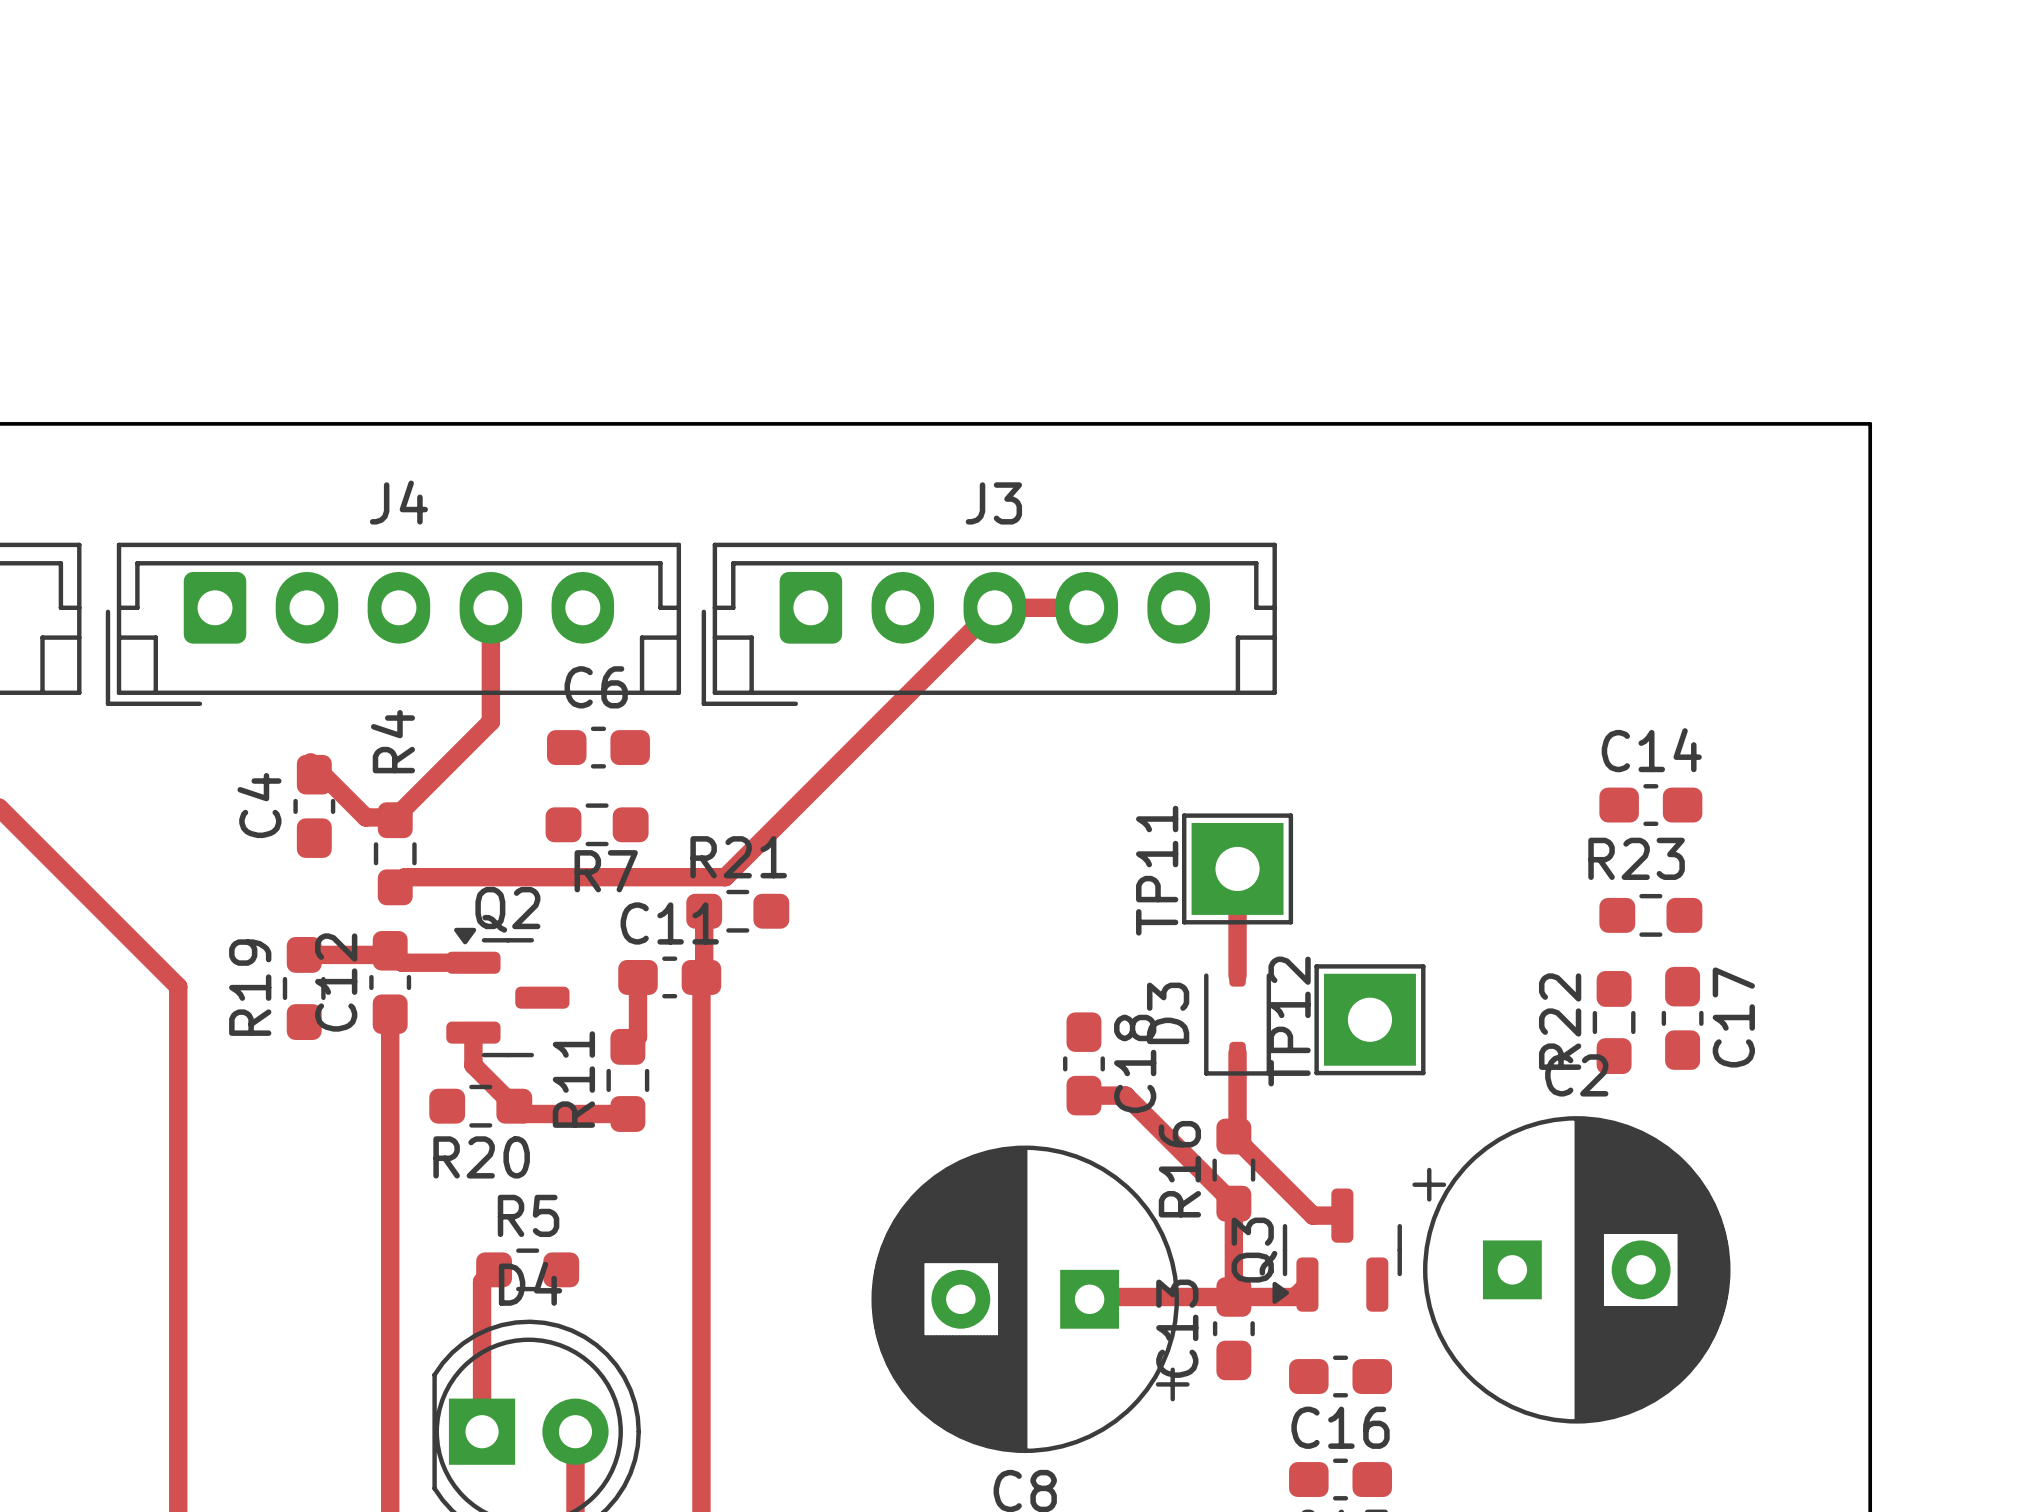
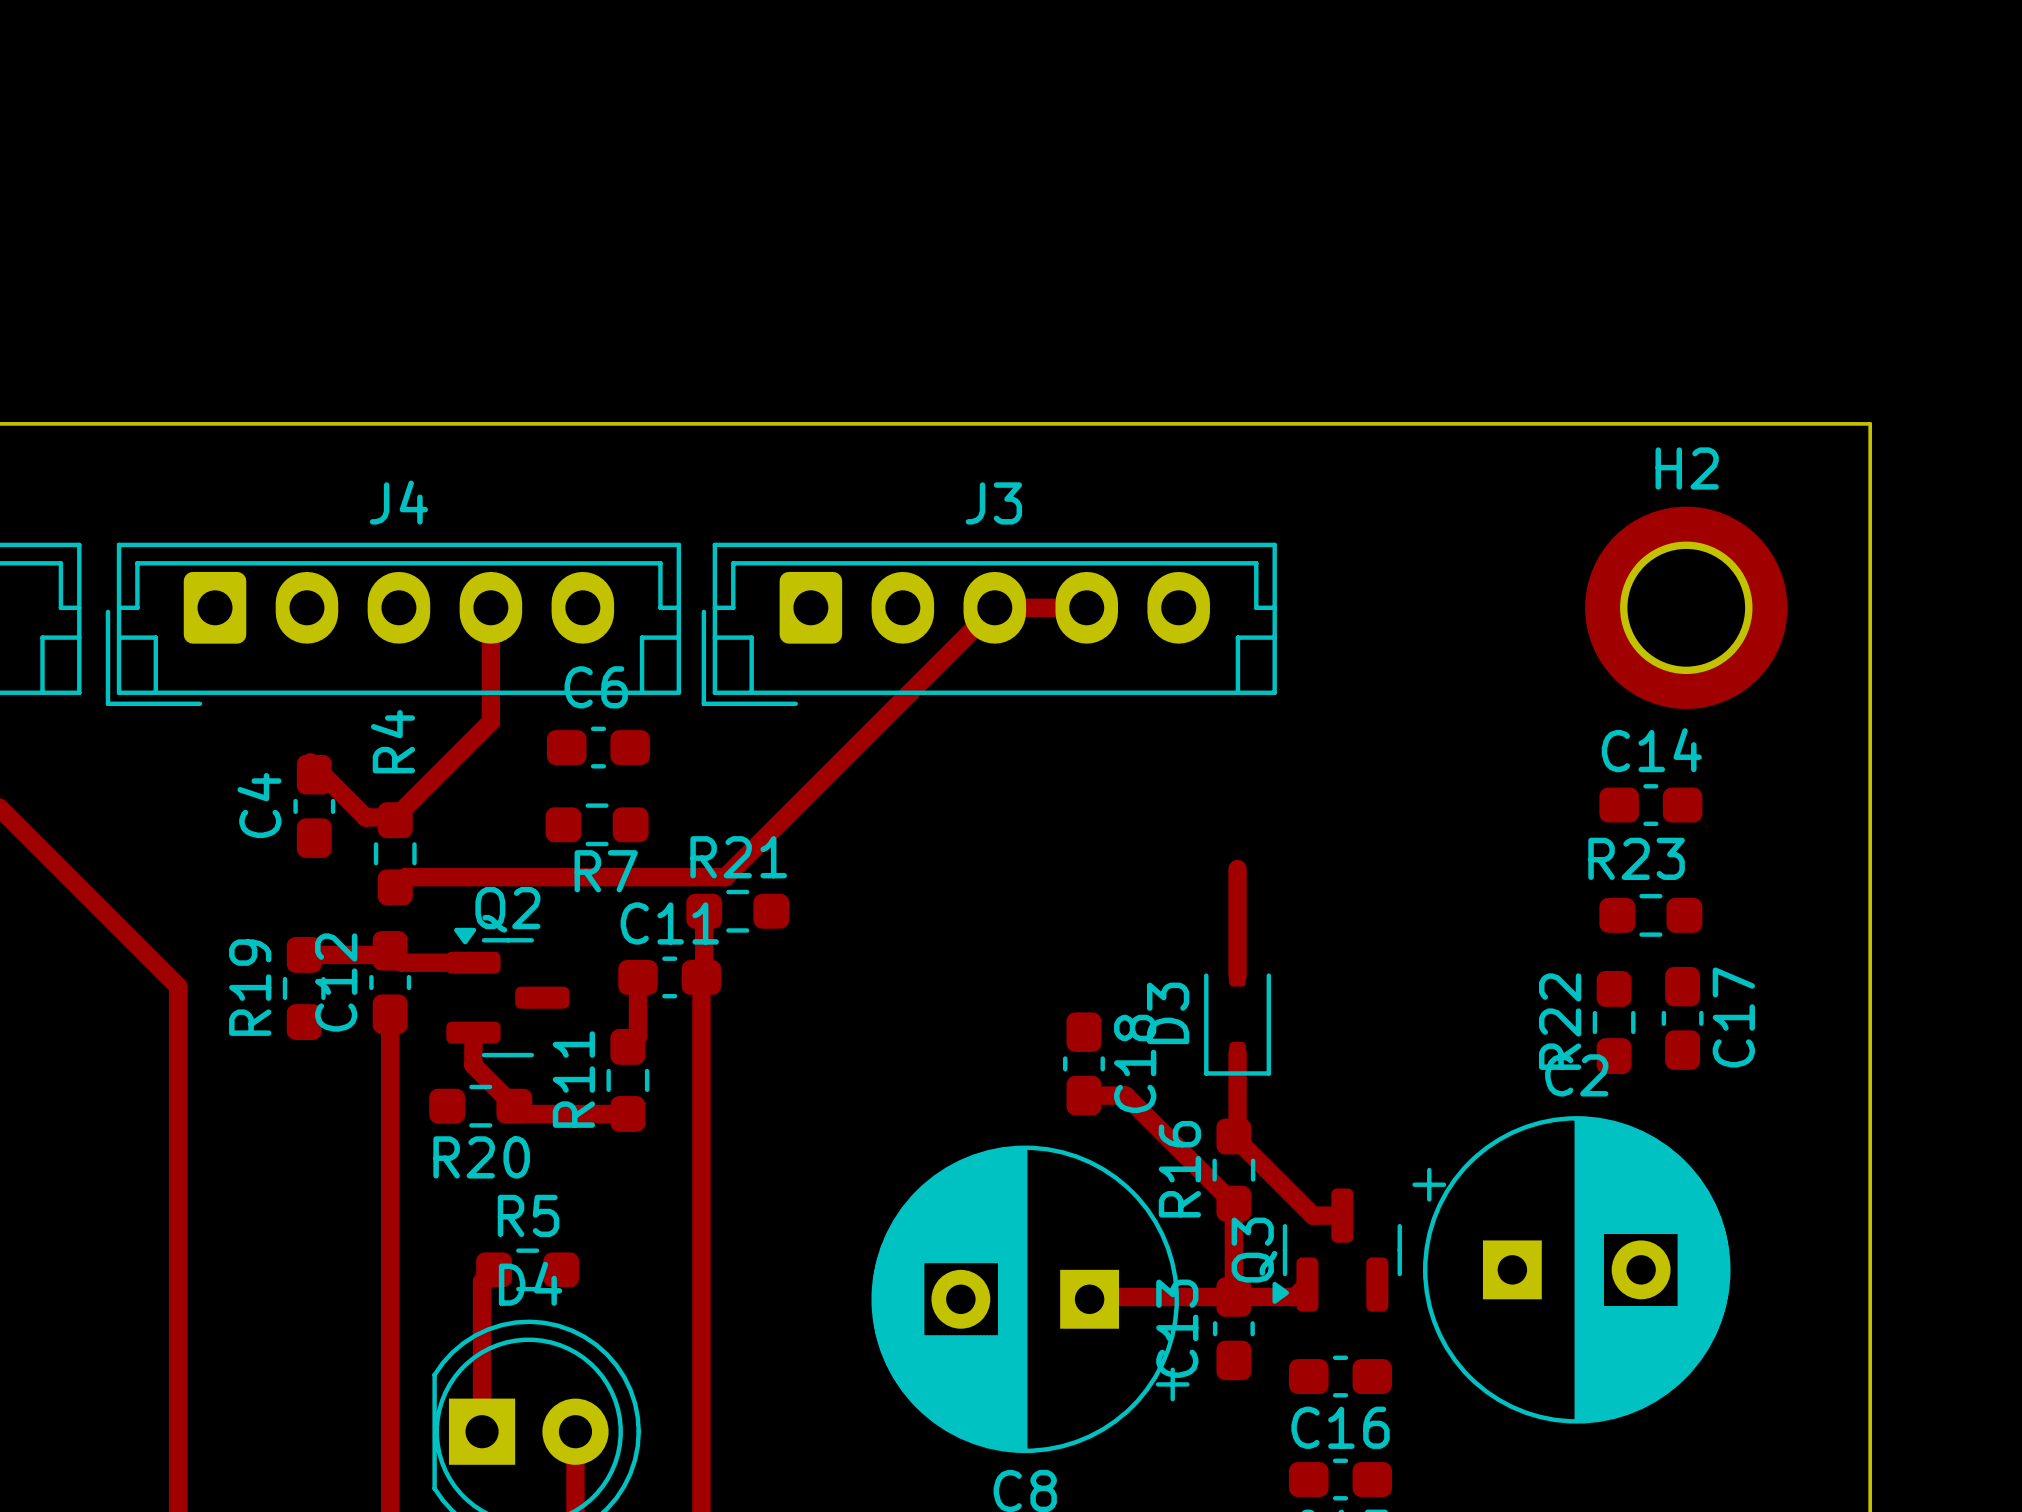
H2: none -> (1686, 607)
TP11: (1237, 868) -> none
TP12: (1369, 1019) -> none

